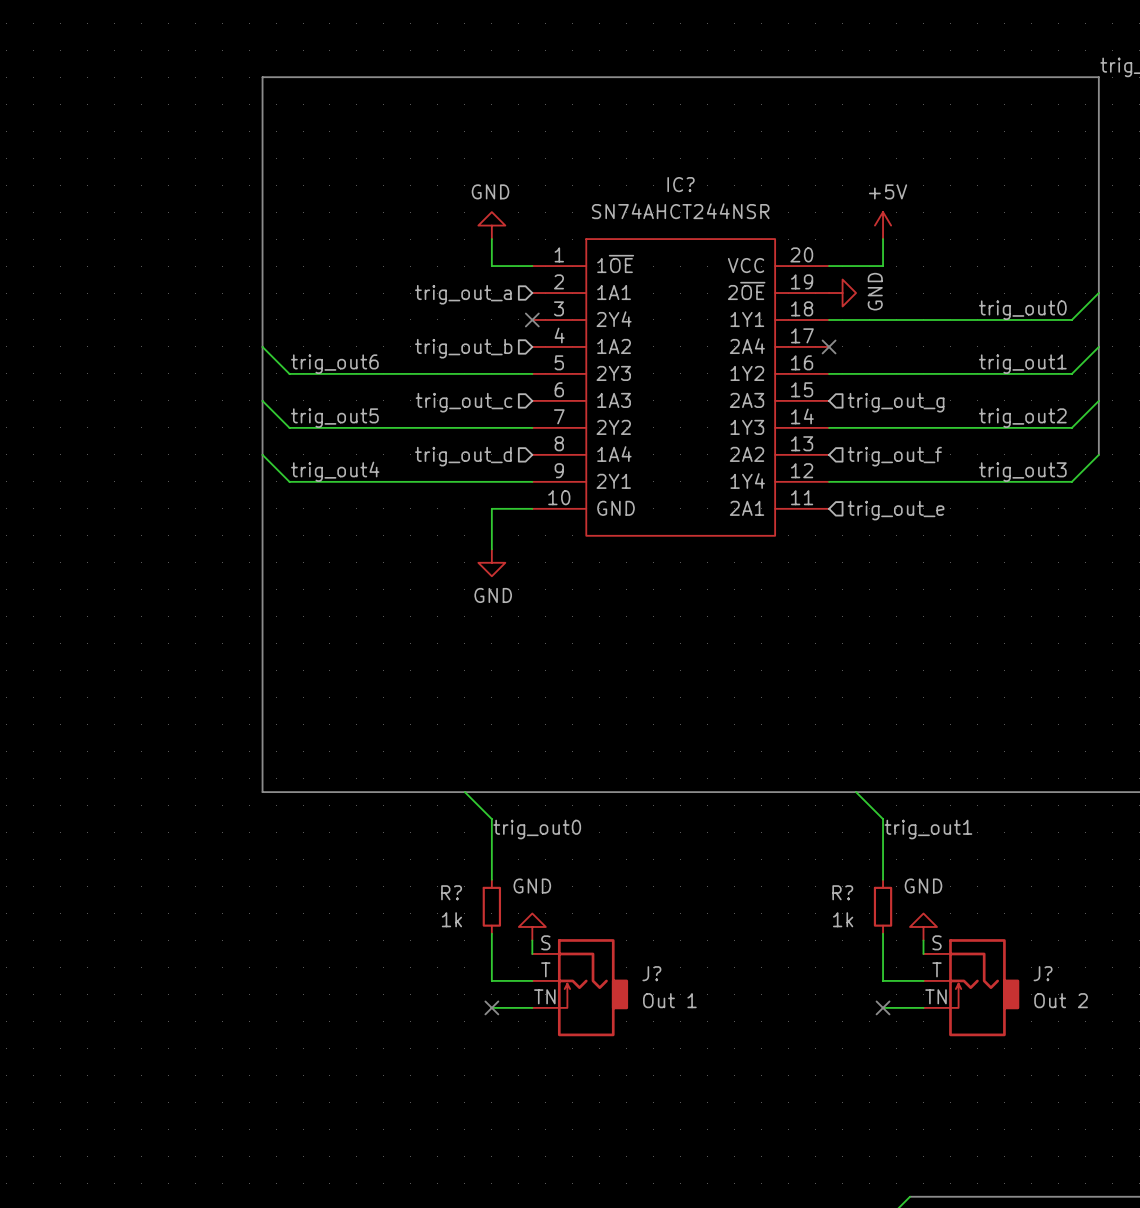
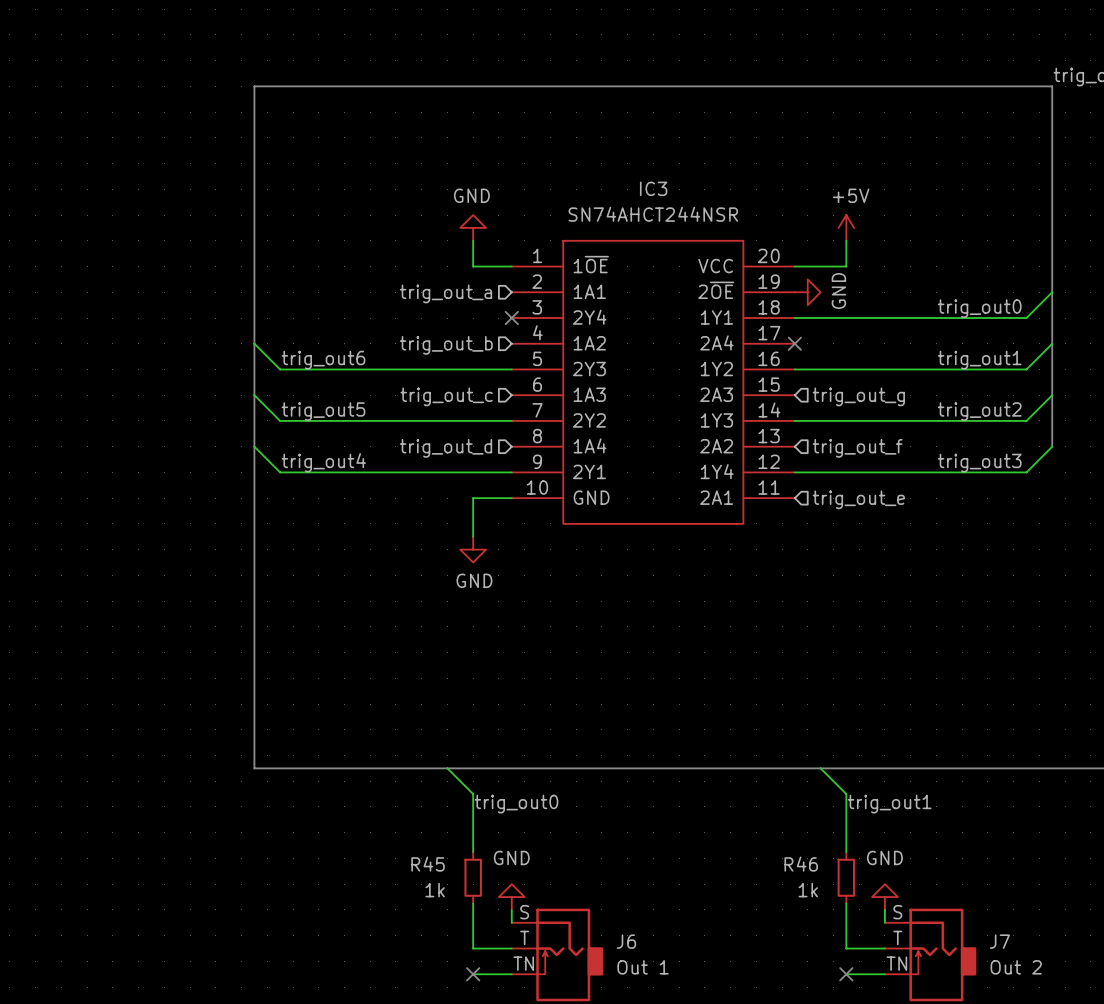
IC? name: IC? (681, 184) -> IC3 (653, 188)
R? name: R? (451, 892) -> R45 (428, 864)
R? name: R? (842, 892) -> R46 (801, 864)
J? name: J? (651, 973) -> J6 (626, 941)
J? name: J? (1043, 973) -> J7 (999, 941)

